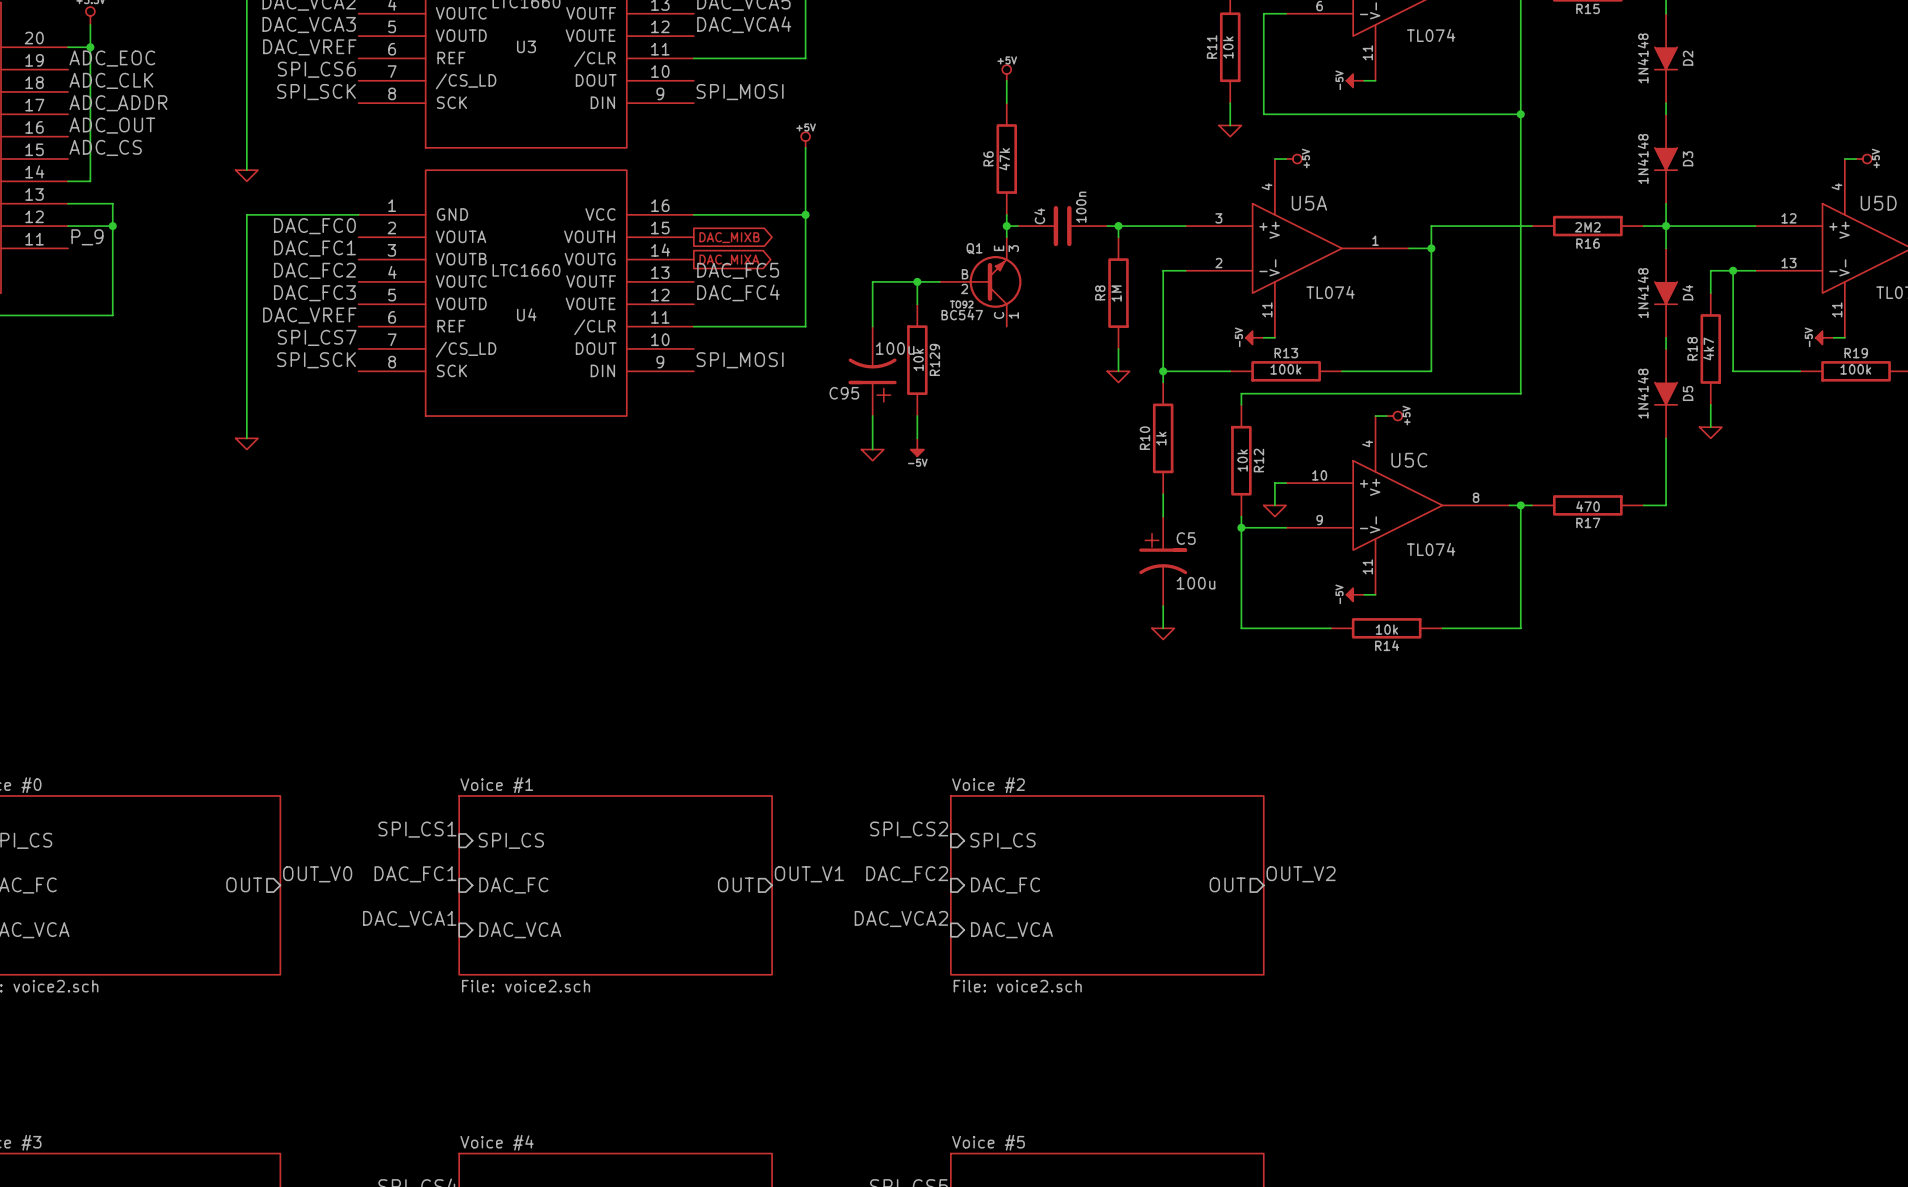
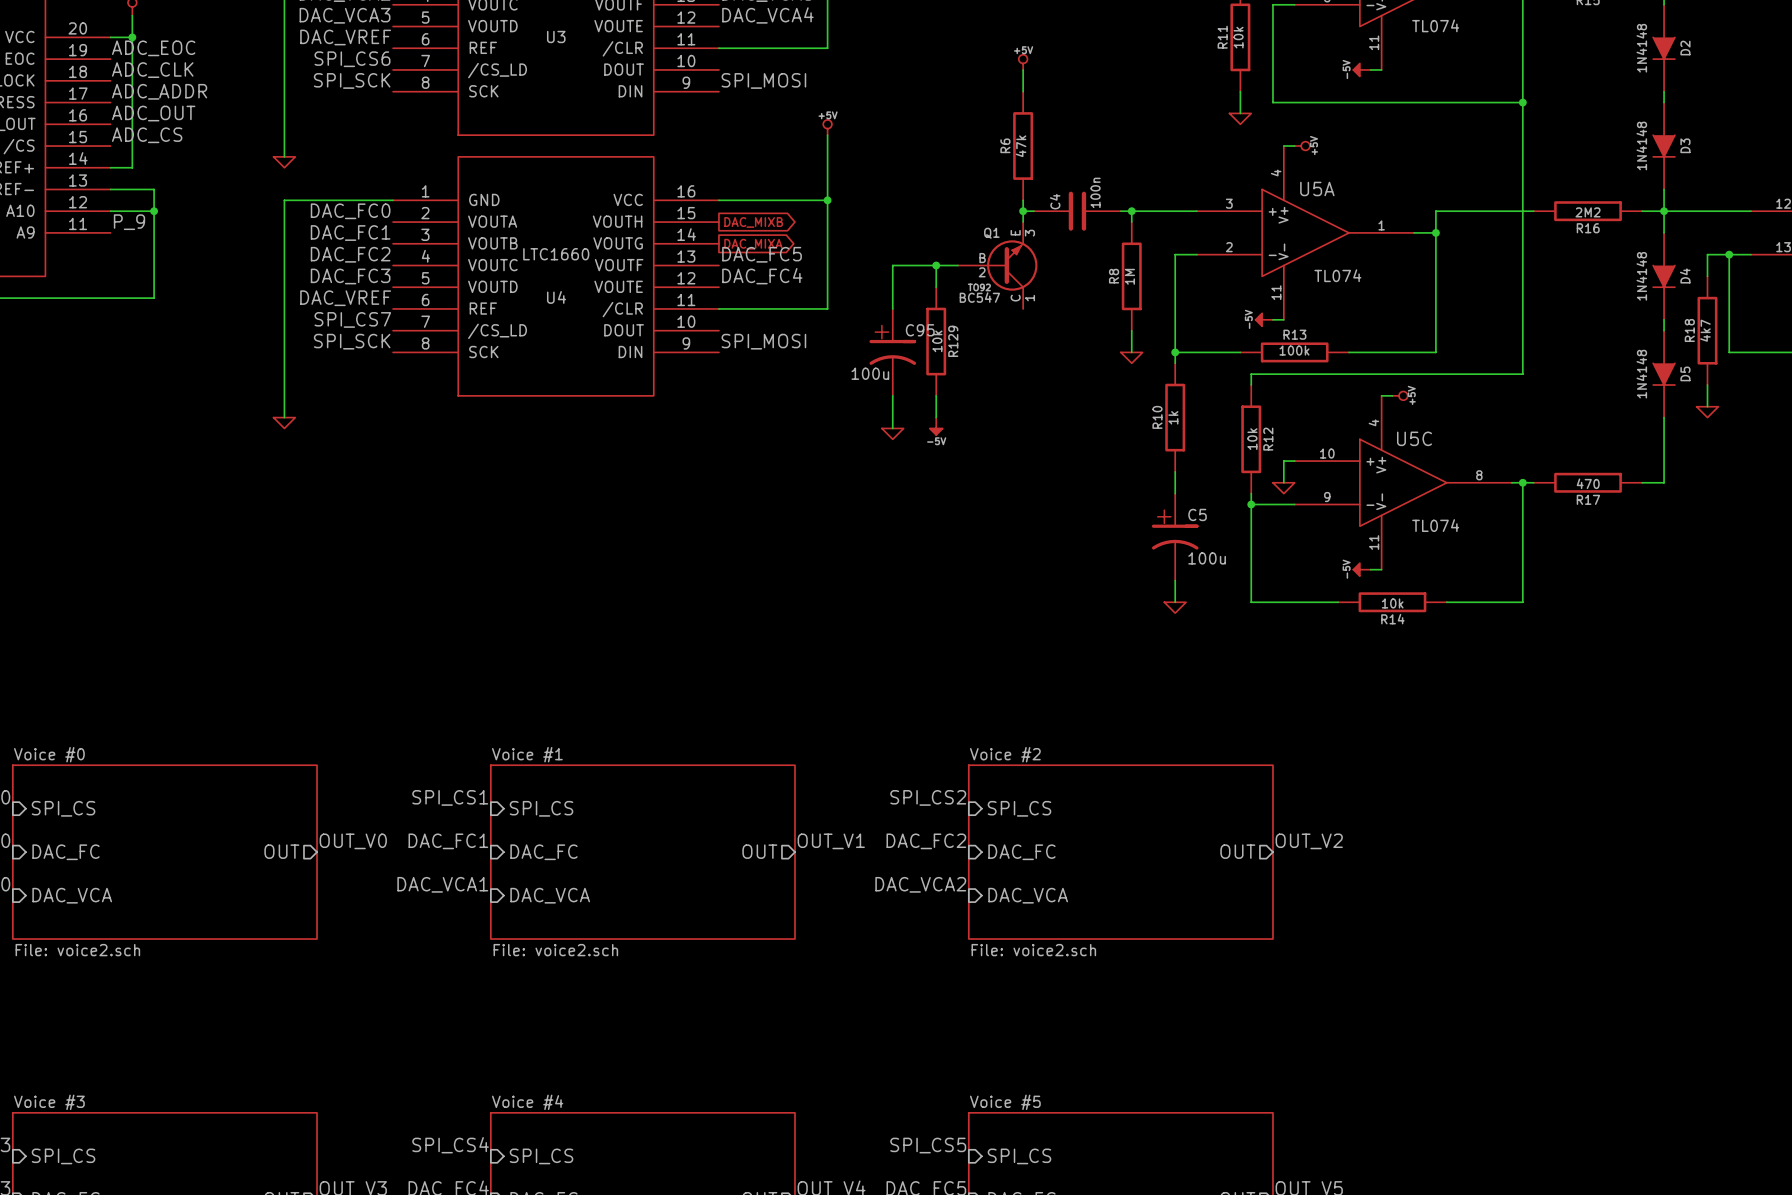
C95 rotation: 0° (872, 371) -> 180° (892, 352)

